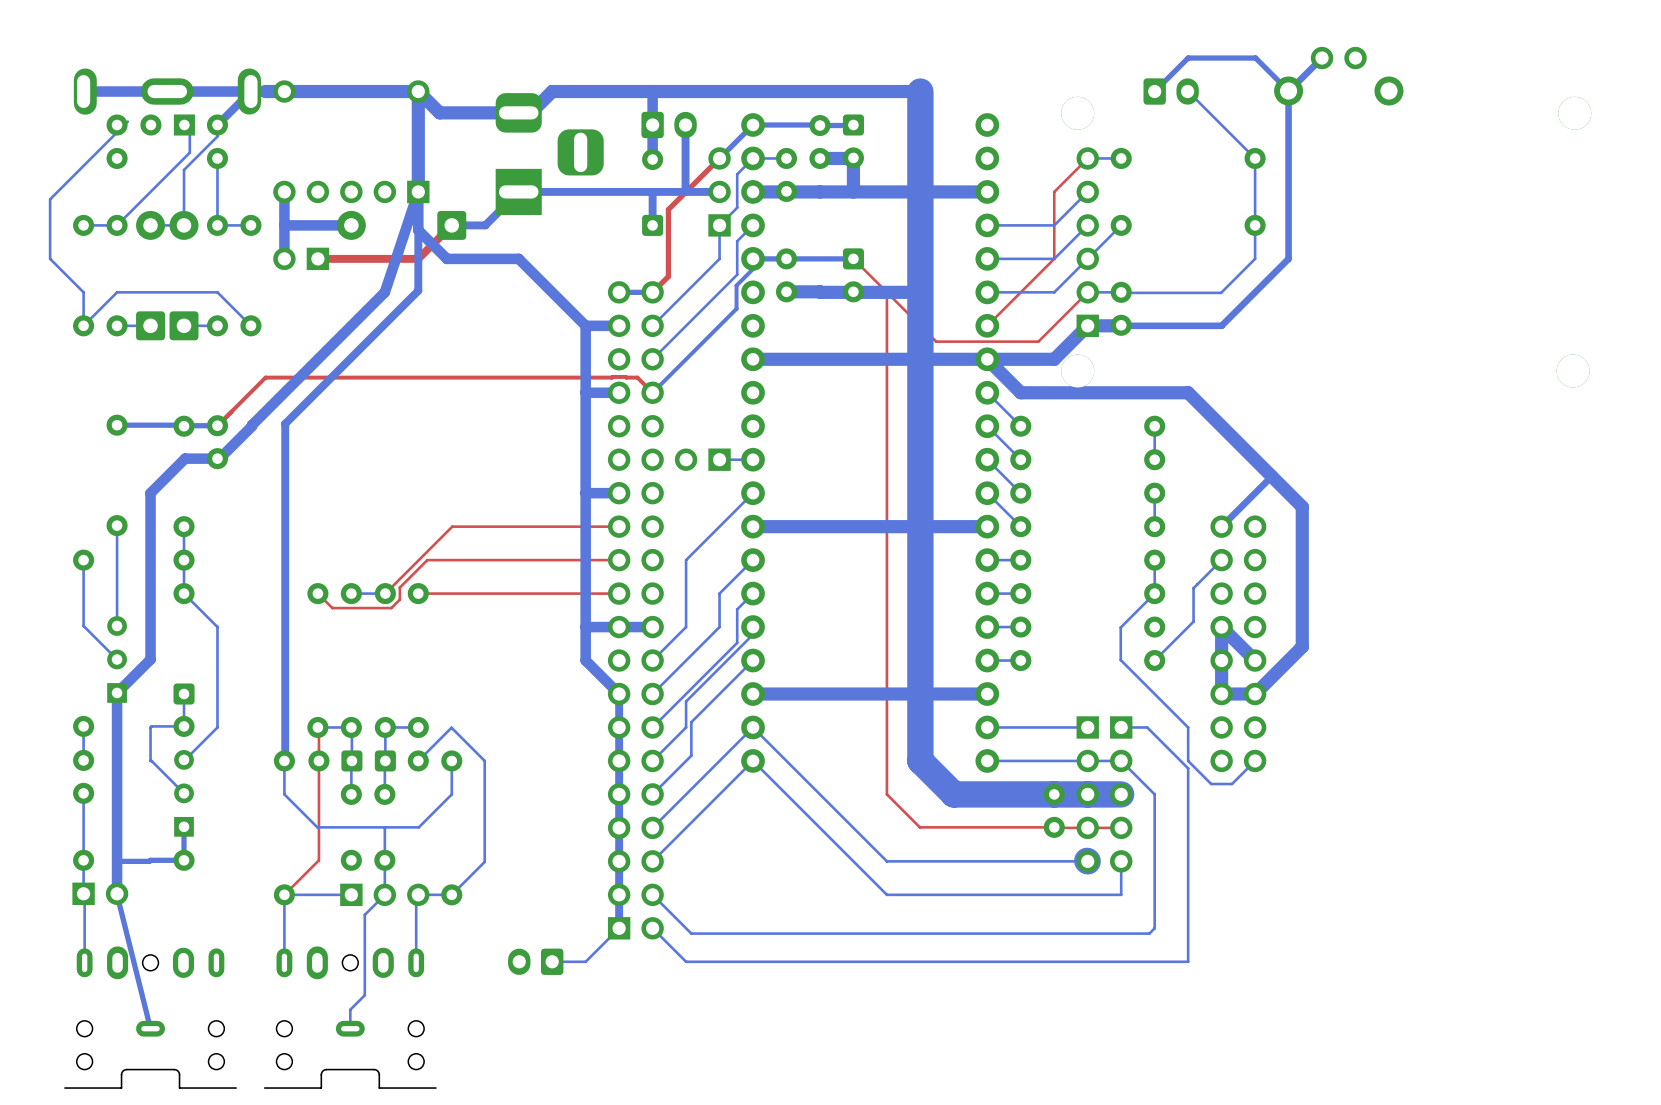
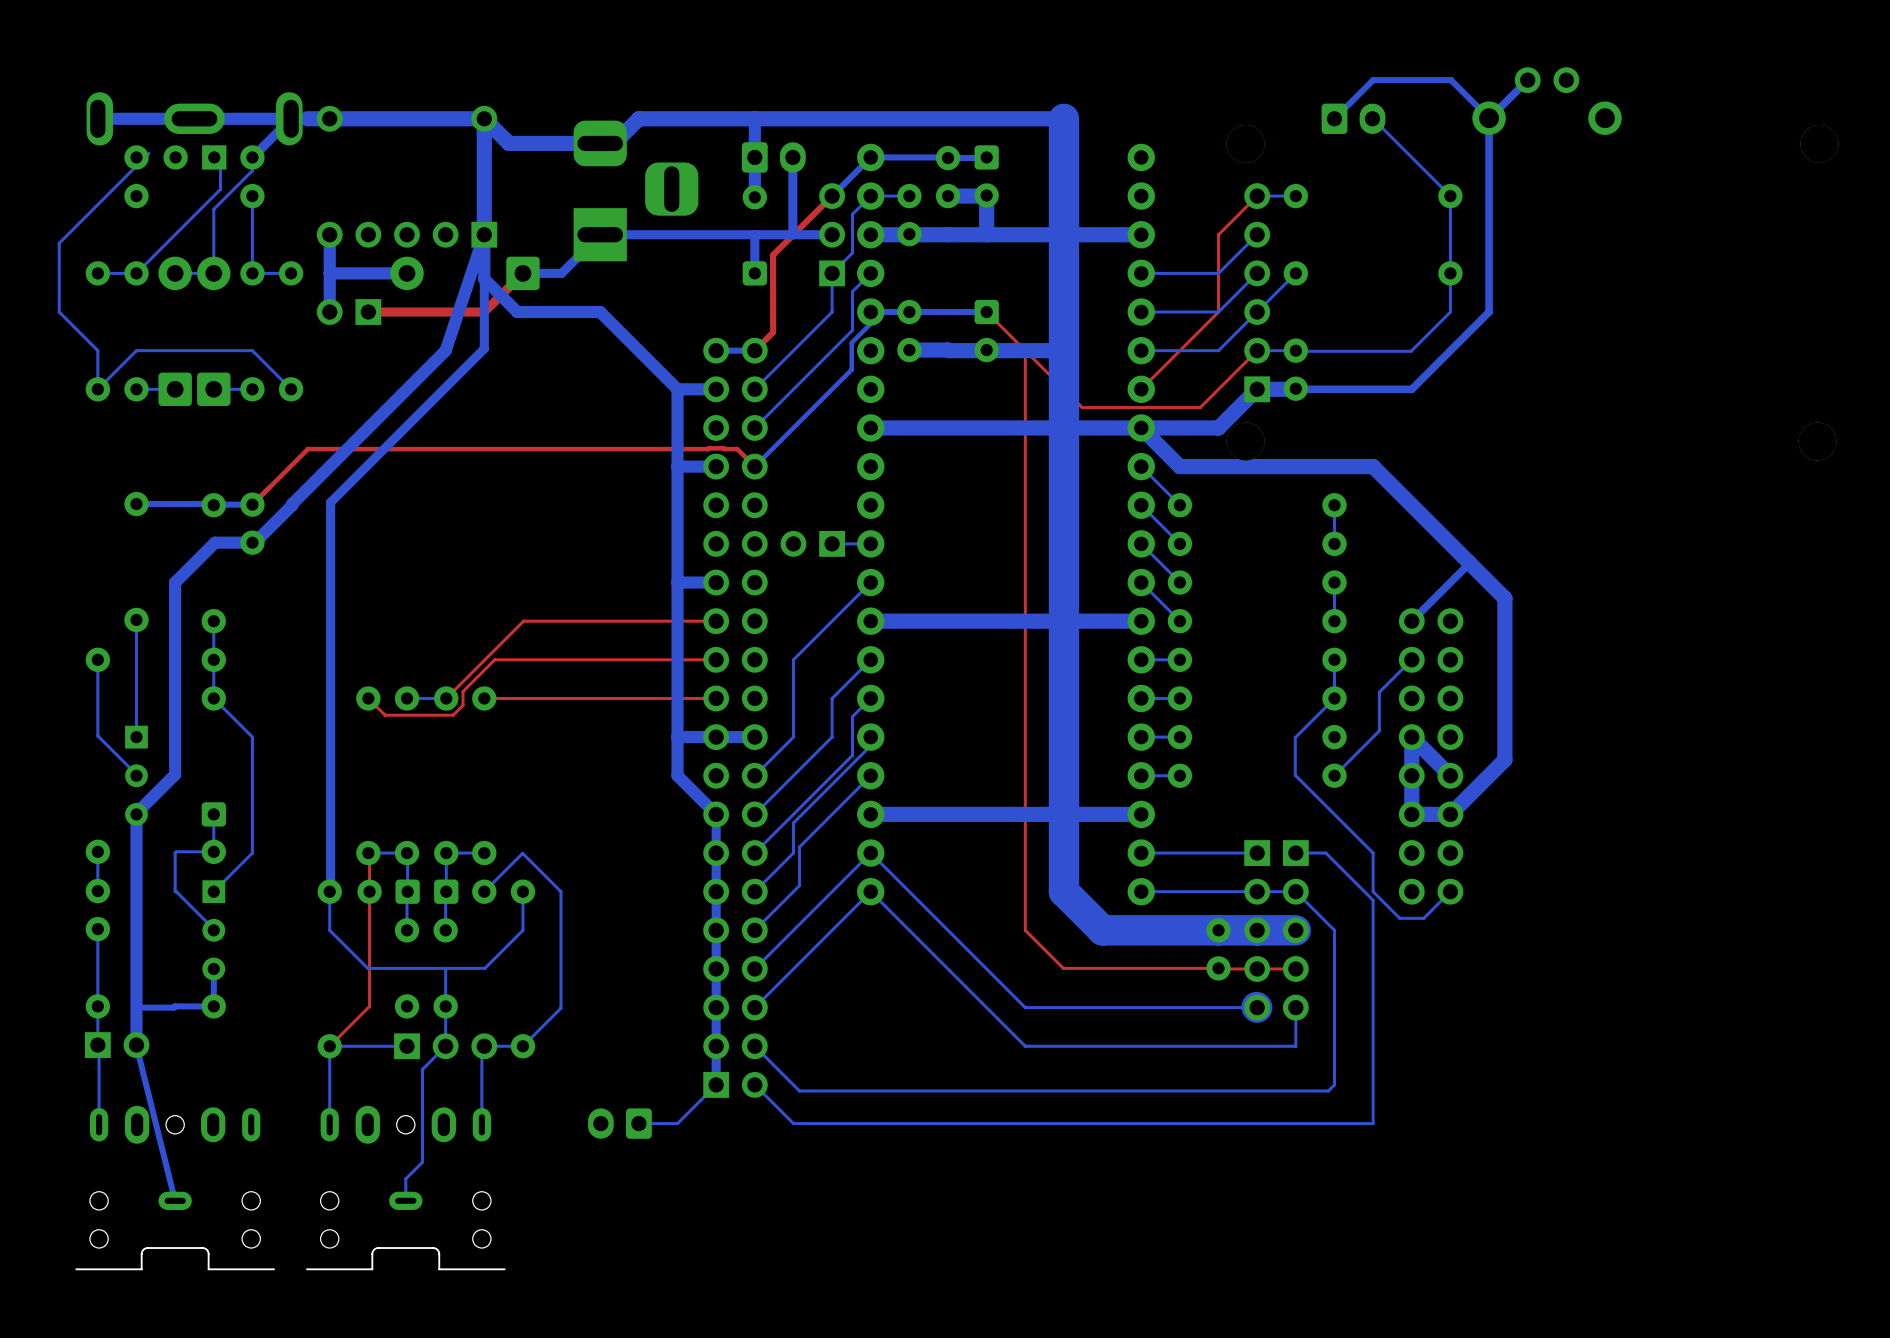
part rotation: 0° (117, 659) -> 180° (136, 775)
part rotation: 0° (184, 793) -> 180° (213, 930)

